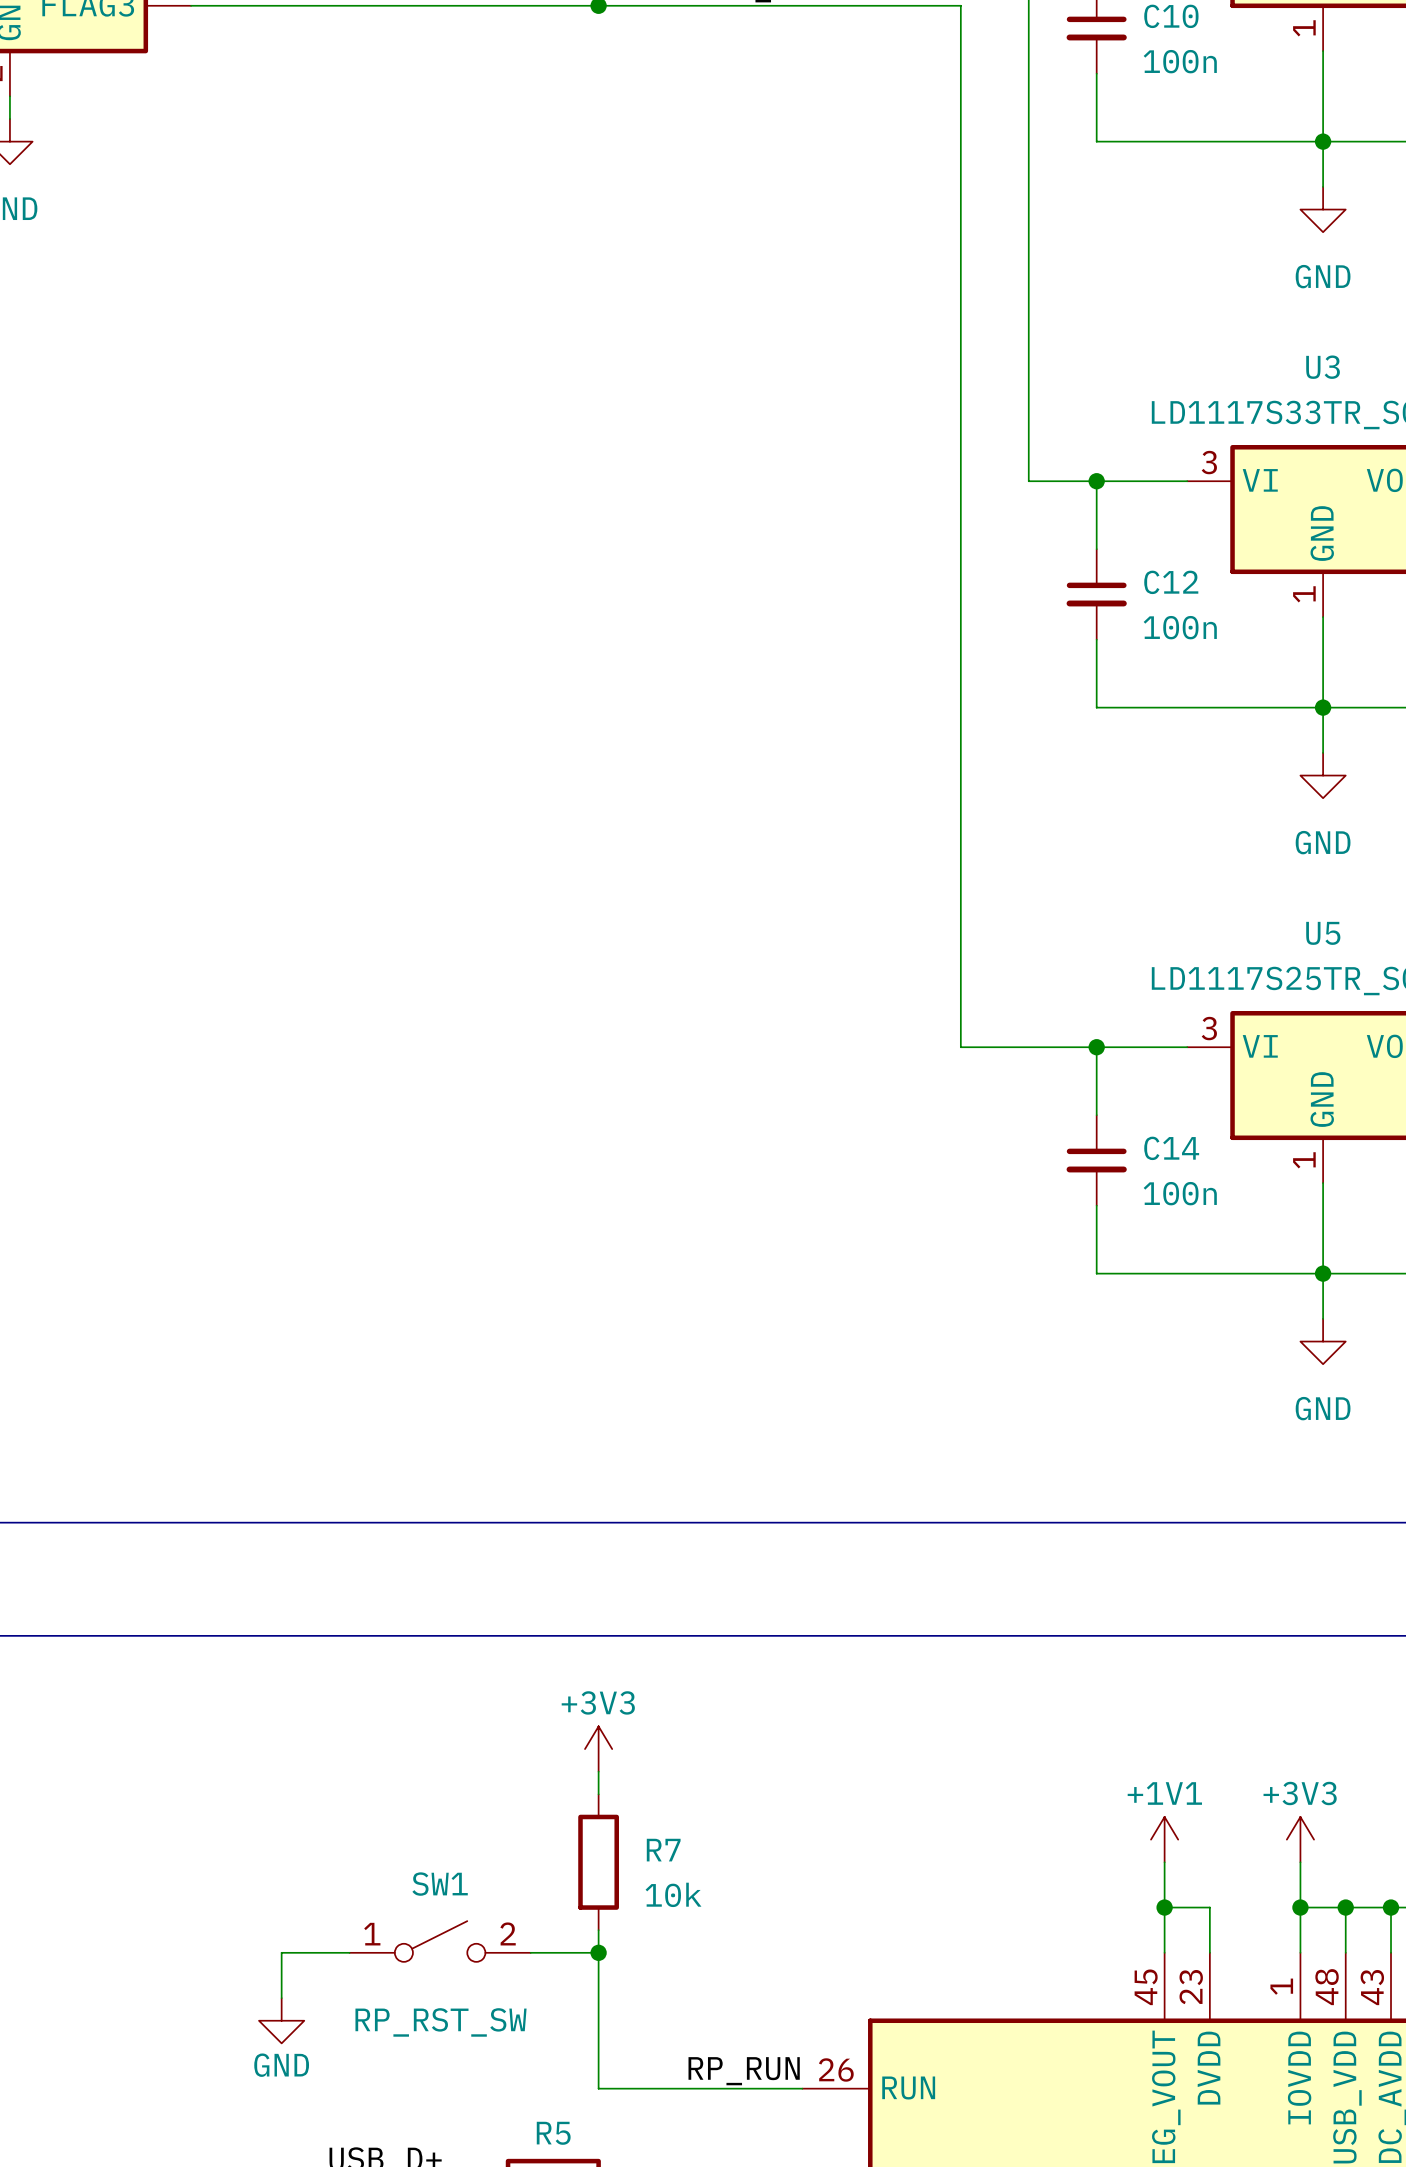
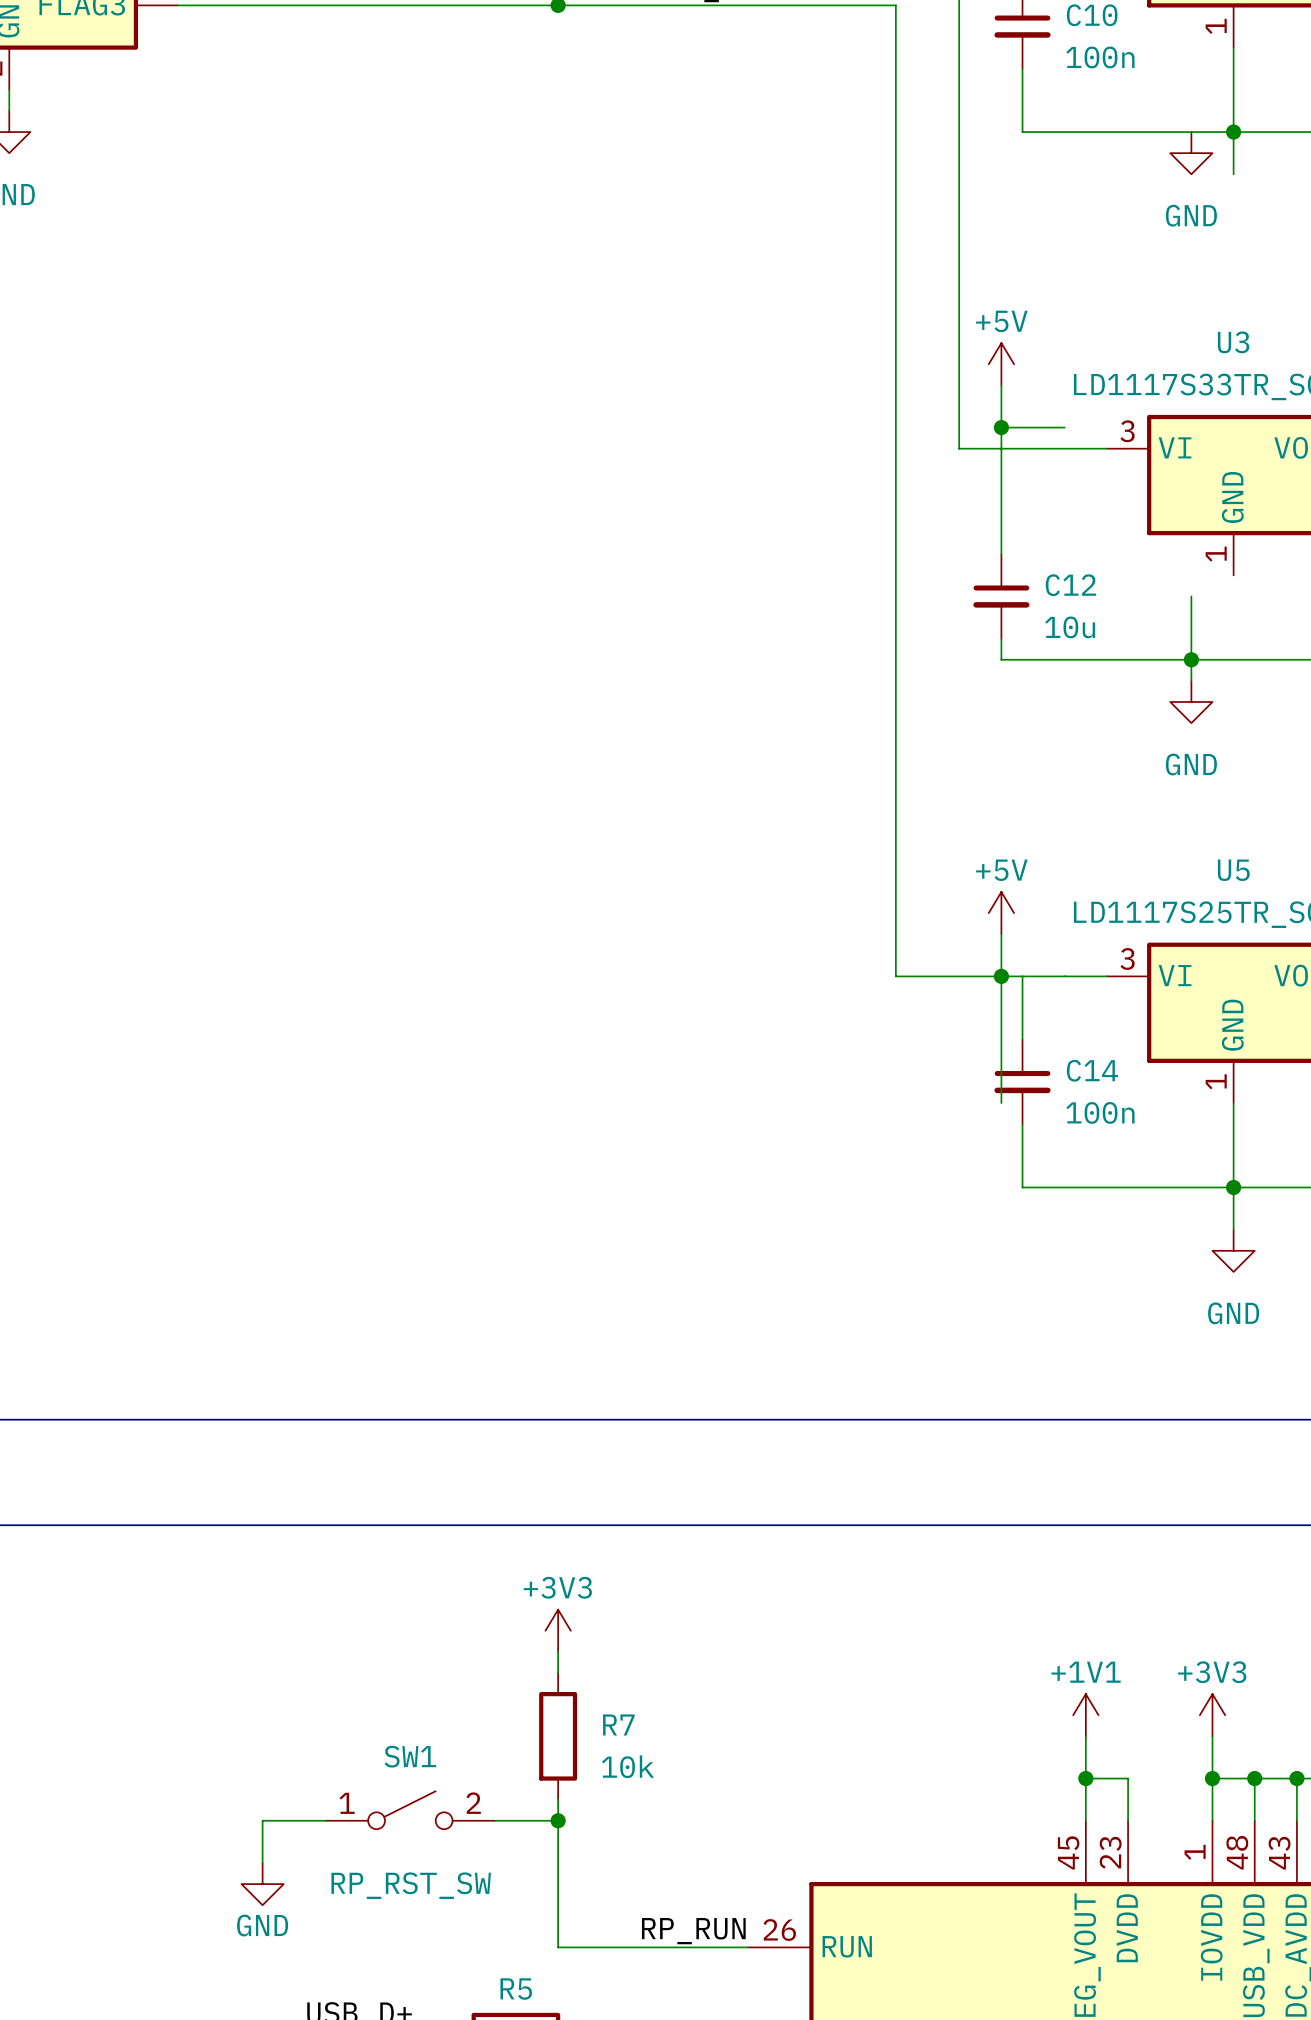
power symbol position: GND (1323, 209) -> GND (1191, 153)
power symbol: none -> +5V (1001, 364)
wire: none -> (1001, 385) (1001, 554)
wire: none -> (1001, 427) (1064, 427)
wire: (1096, 481) (1096, 549) -> none
junction position: (1096, 481) -> (1001, 427)
C12 position: (1096, 594) -> (1001, 596)
wire: (1323, 617) (1323, 752) -> none
C12 value: 100n (1180, 627) -> 10u (1070, 627)
wire: (1096, 639) (1096, 707) -> (1001, 638) (1001, 659) (1022, 659)
wire: none -> (1191, 596) (1191, 680)
junction position: (1323, 707) -> (1191, 659)
power symbol position: GND (1323, 775) -> GND (1191, 701)
power symbol: none -> +5V (1001, 913)
wire: none -> (1001, 934) (1001, 1103)
junction position: (1096, 1047) -> (1001, 976)

